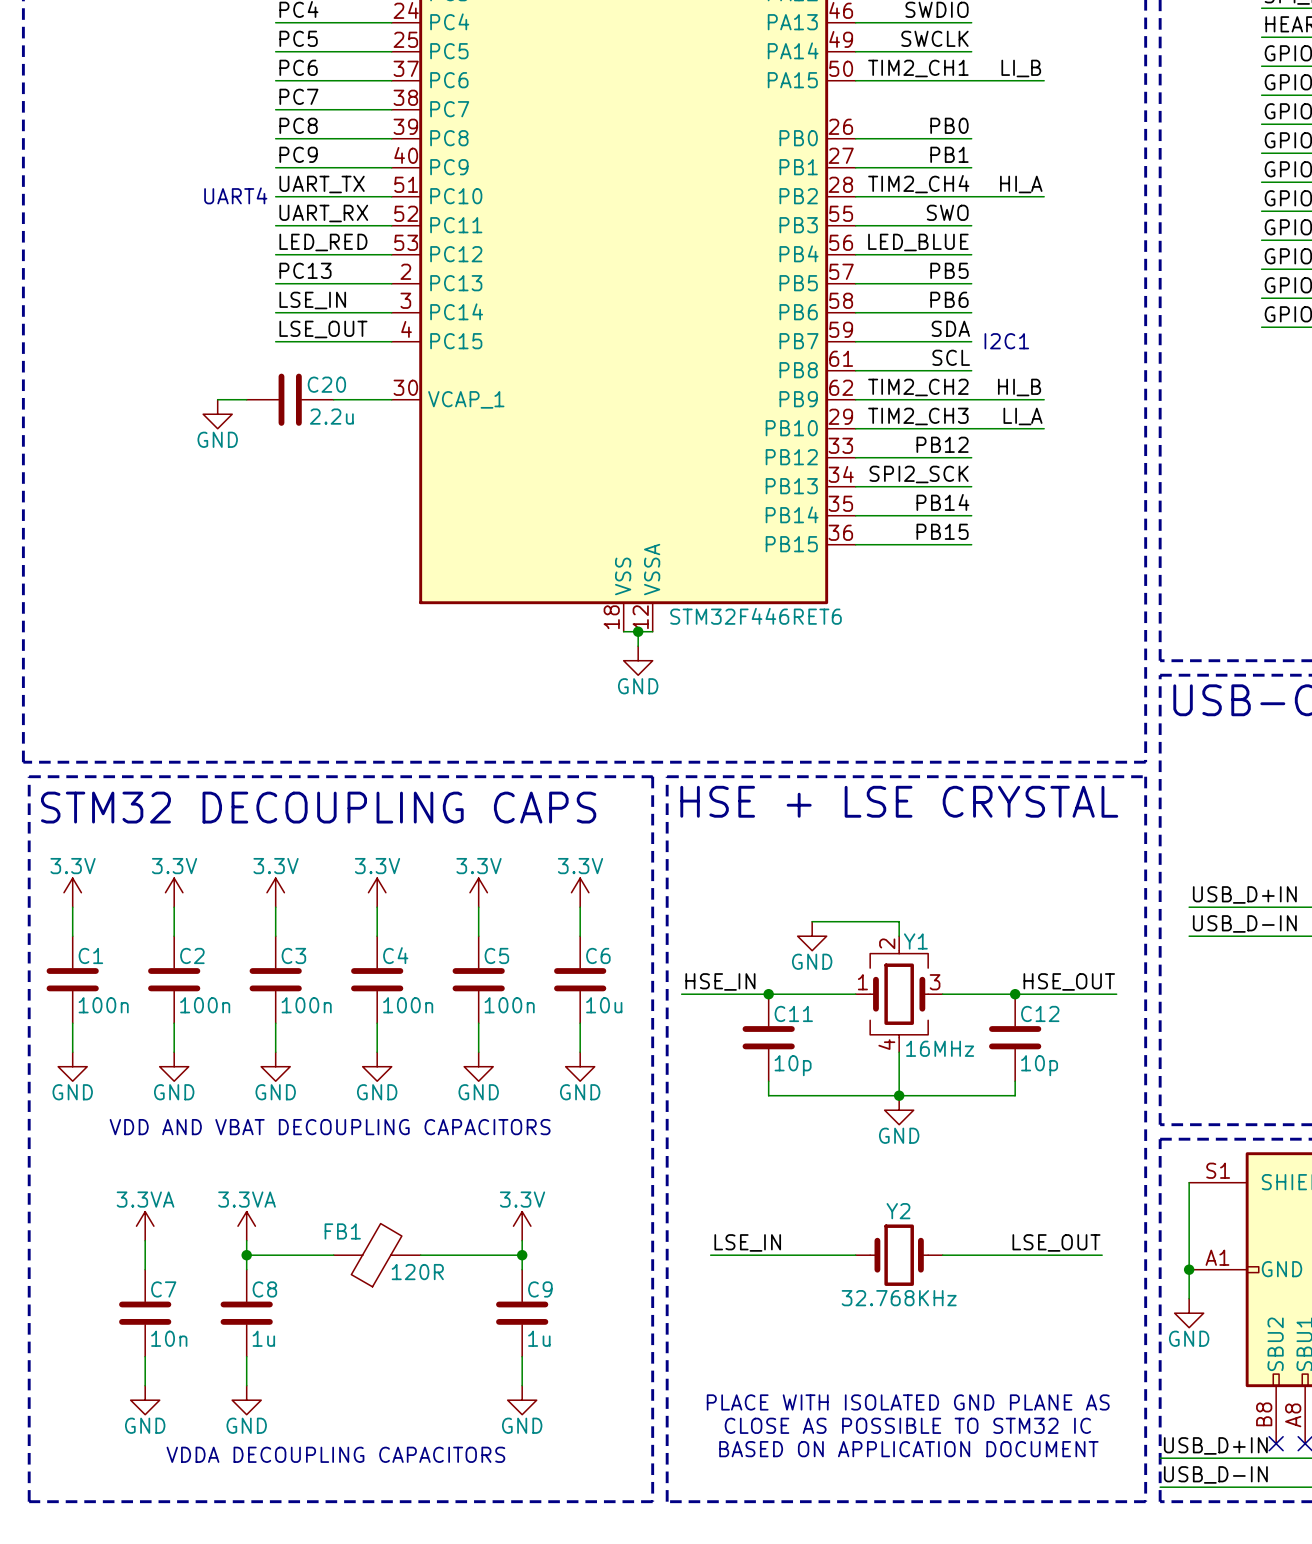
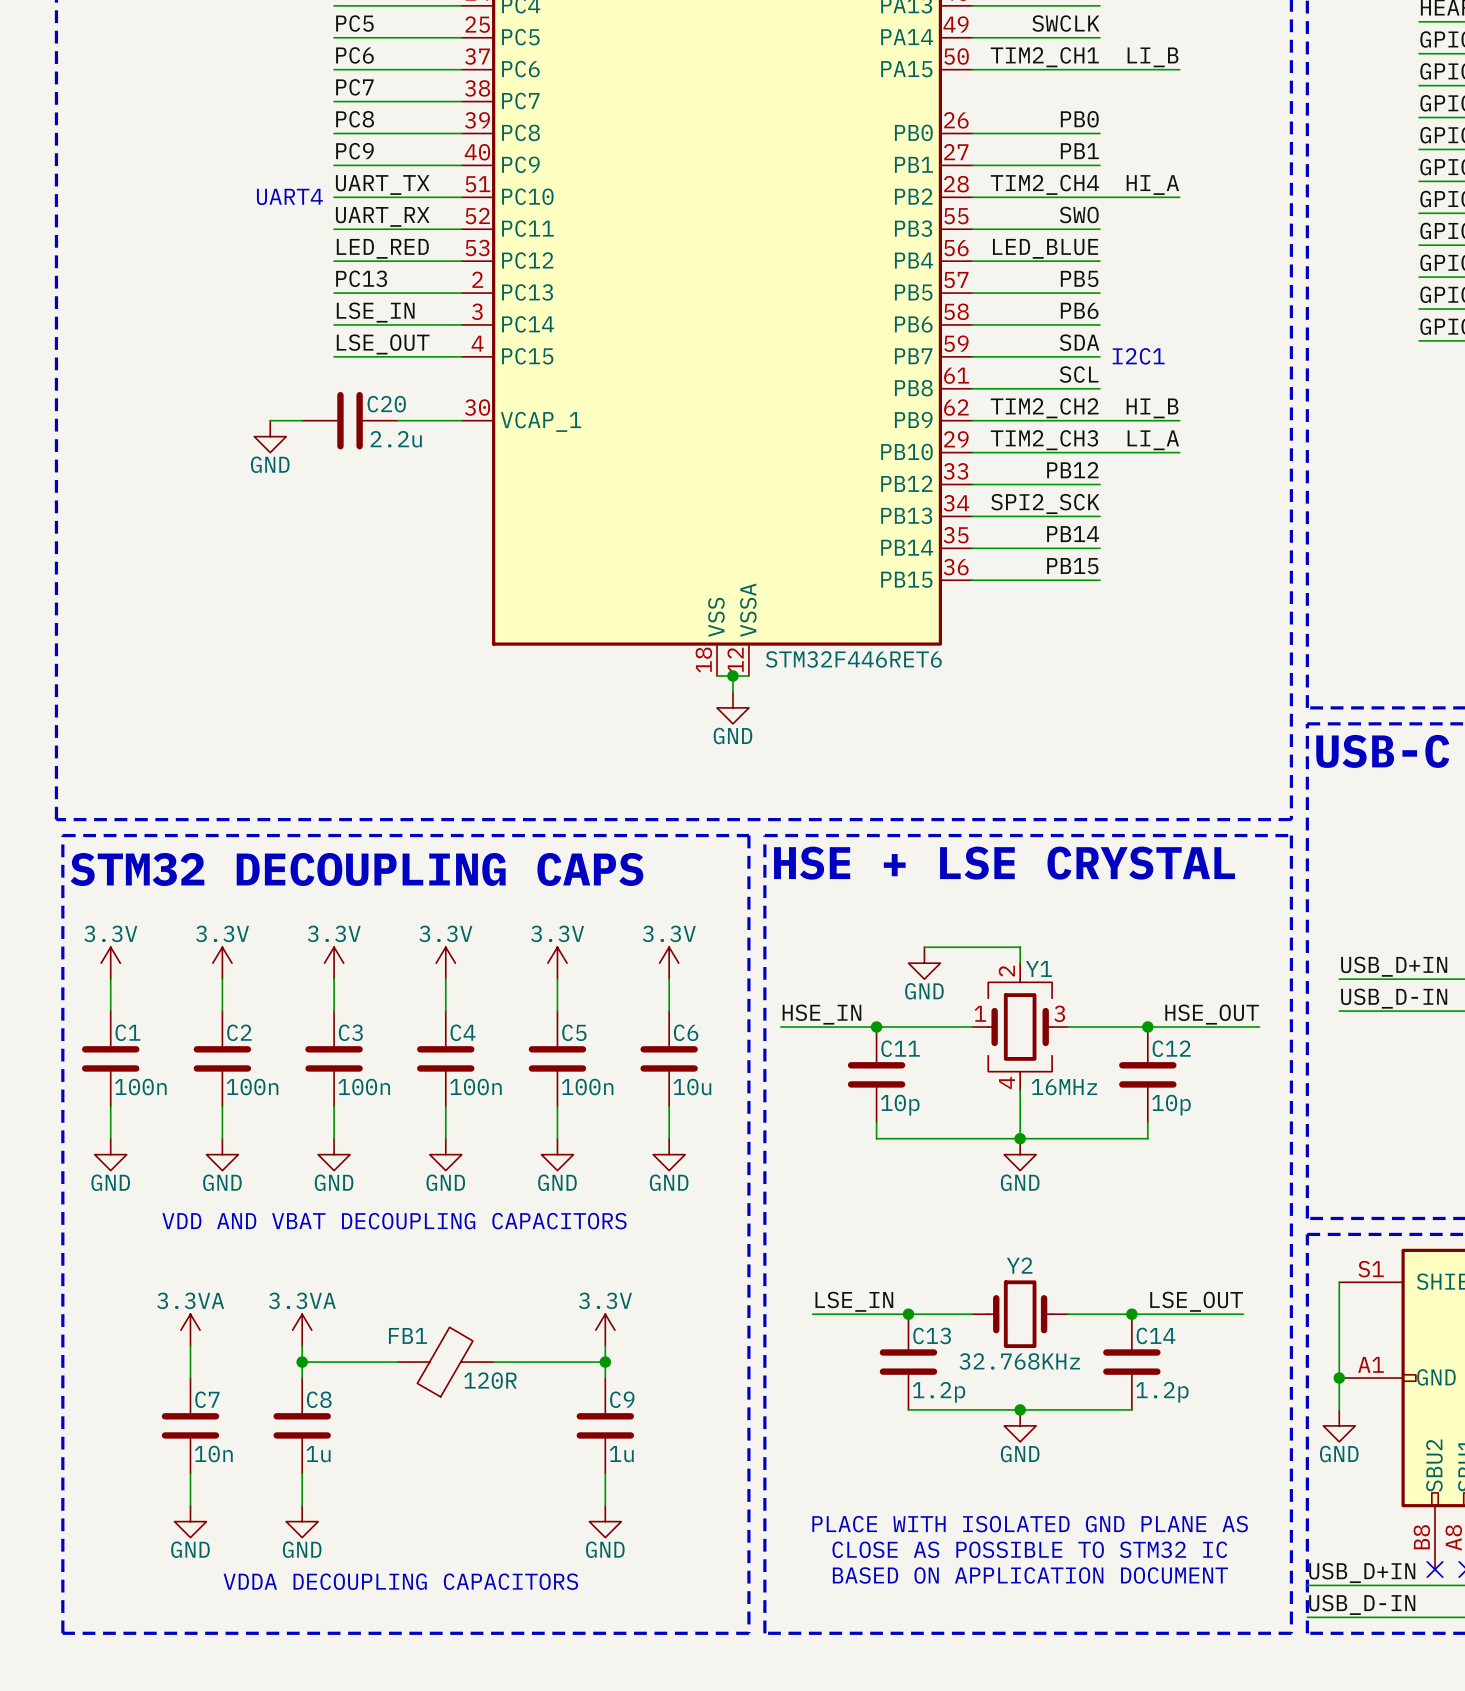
wire: (812, 921) (899, 921) (899, 936) -> (924, 947) (1020, 947) (1020, 963)
power symbol position: GND (812, 936) -> GND (924, 963)
label position: HSE_IN (720, 981) -> HSE_IN (821, 1014)
label position: HSE_OUT (1069, 981) -> HSE_OUT (1212, 1014)
wire: (681, 994) (855, 994) -> (780, 1027) (972, 1027)
junction position: (768, 994) -> (876, 1027)
Y1 position: (899, 994) -> (1020, 1027)
wire: (942, 994) (1116, 994) -> (1068, 1027) (1259, 1027)
junction position: (1015, 994) -> (1147, 1027)
C11 position: (768, 1037) -> (876, 1074)
C12 position: (1015, 1037) -> (1147, 1074)
wire: (899, 1052) (899, 1095) -> (1020, 1138) (1020, 1090)
wire: (768, 1081) (768, 1095) (1015, 1095) (1015, 1081) -> (876, 1122) (876, 1138) (1147, 1138) (1147, 1122)
junction position: (899, 1095) -> (1020, 1138)
power symbol position: GND (899, 1110) -> GND (1020, 1154)
junction: none -> (908, 1314)
junction: none -> (1131, 1314)
label position: LSE_IN (747, 1242) -> LSE_IN (854, 1301)
label position: LSE_OUT (1056, 1242) -> LSE_OUT (1196, 1301)
wire: (710, 1255) (855, 1255) -> (812, 1314) (972, 1314)
C13: none -> 1.2p (908, 1362)
Y2 position: (899, 1255) -> (1020, 1314)
wire: (942, 1255) (1102, 1255) -> (1068, 1314) (1243, 1314)
C14: none -> 1.2p (1131, 1362)
wire: none -> (908, 1409) (1131, 1409)
junction: none -> (1020, 1409)
power symbol: none -> GND (1020, 1425)

